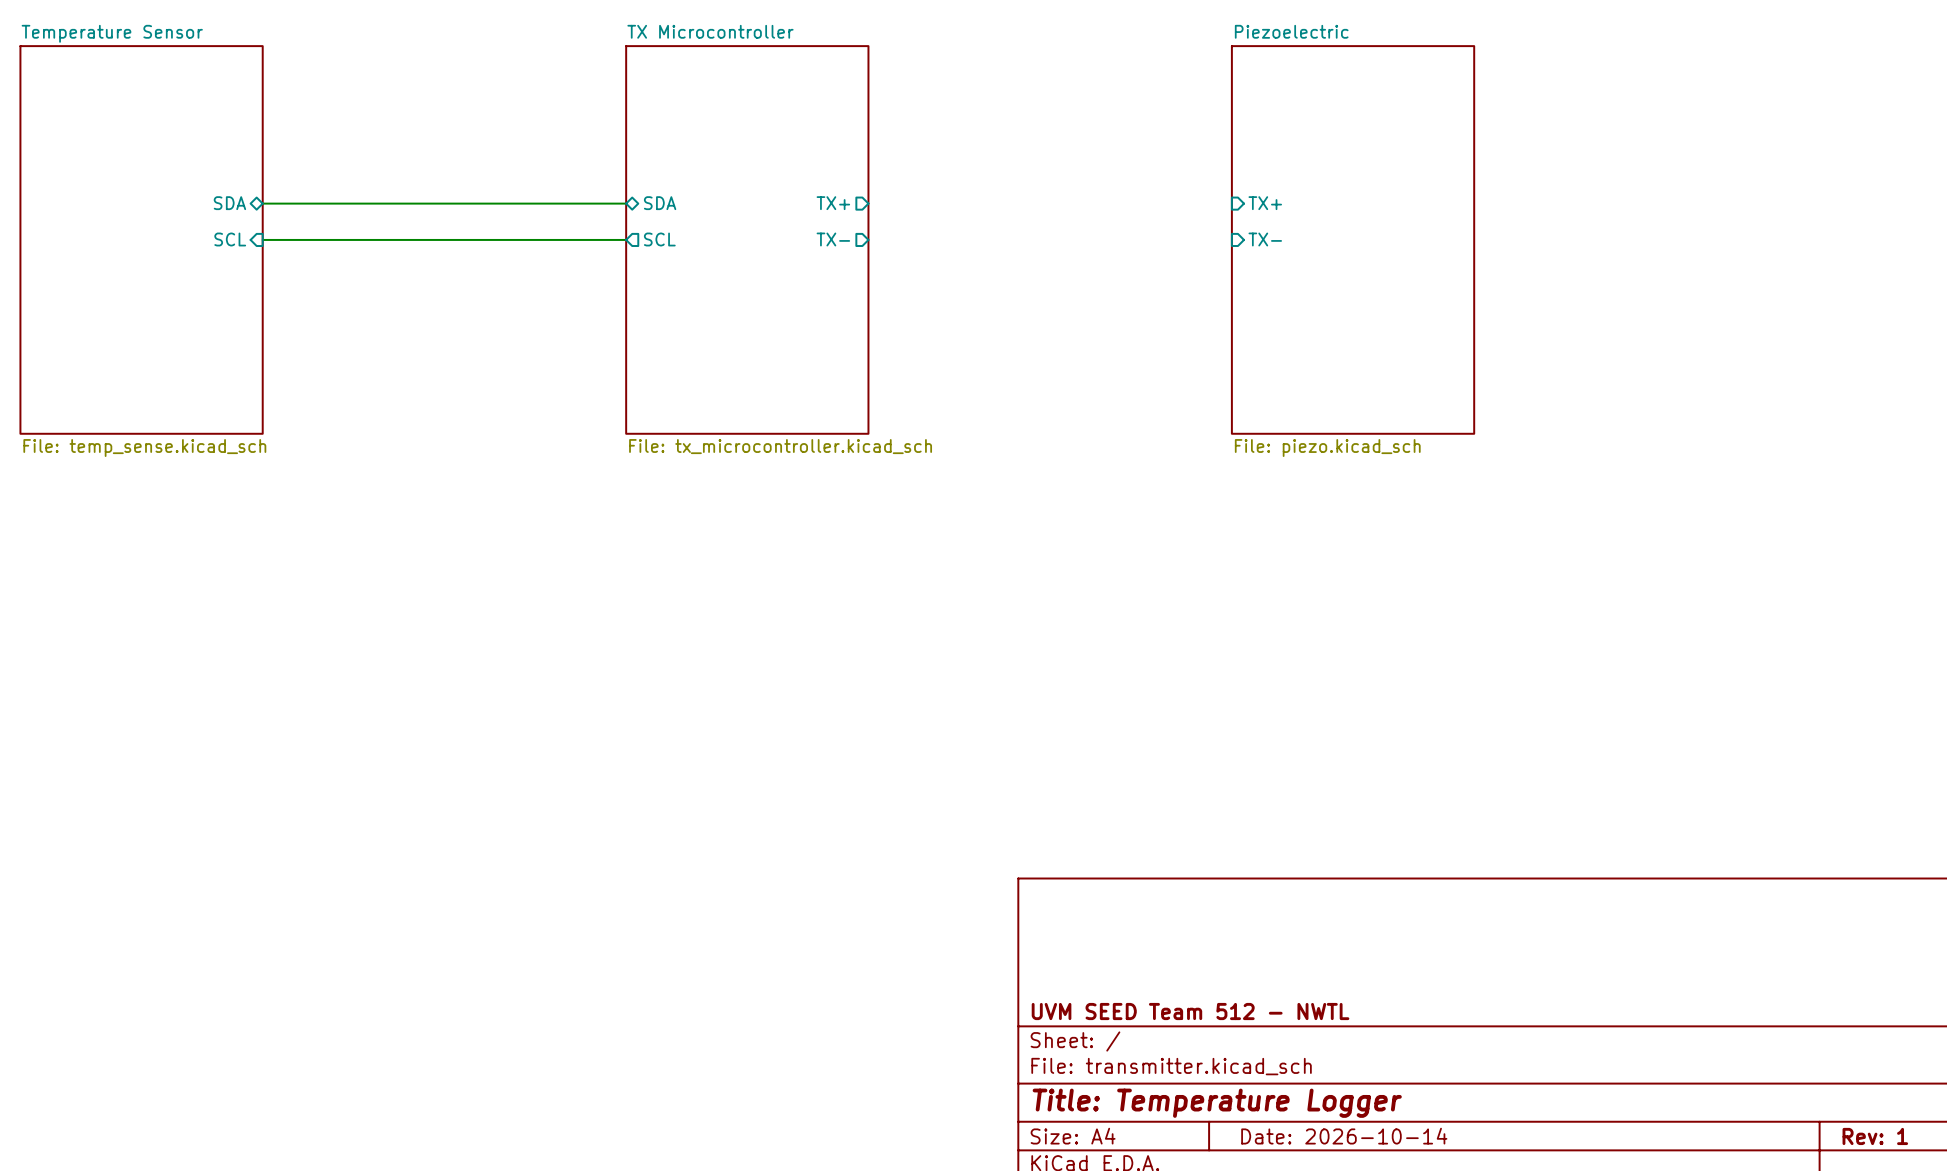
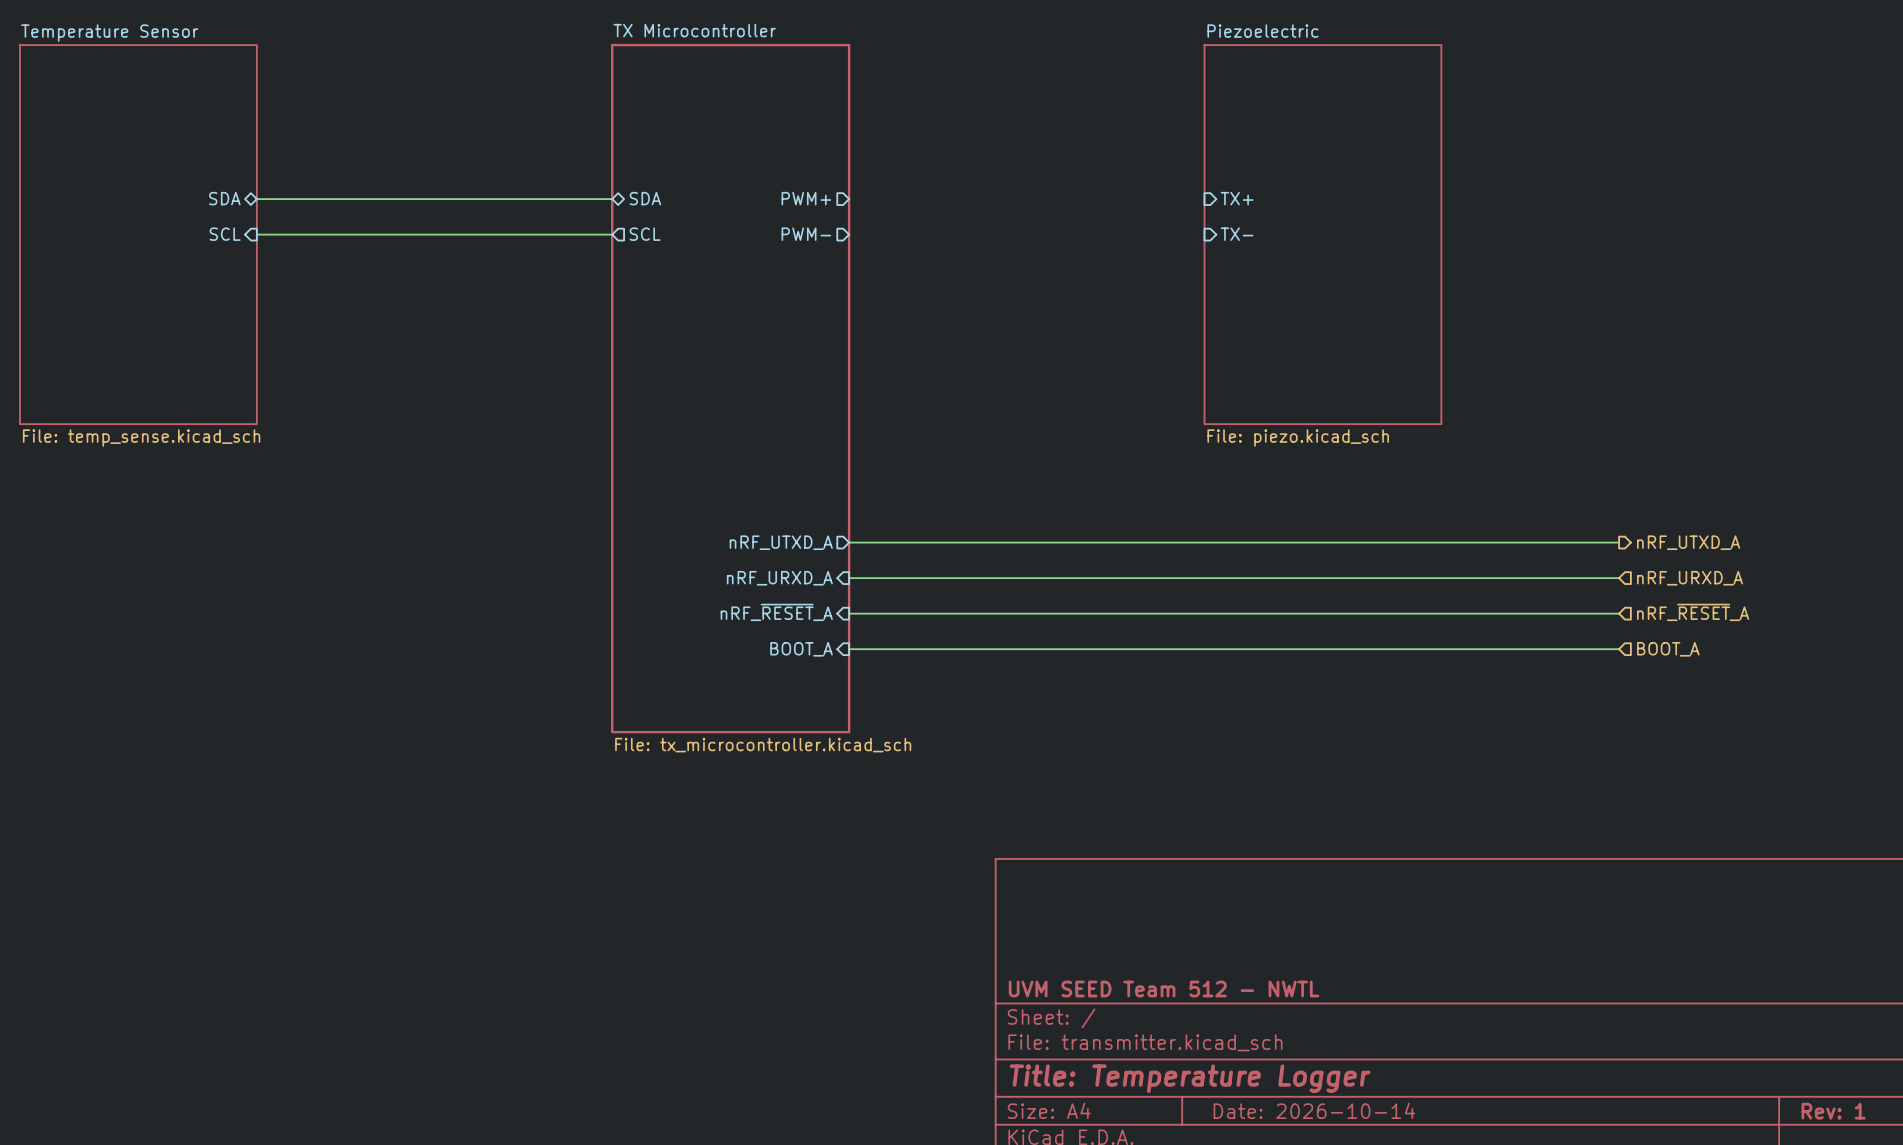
sheet pin: TX+ (833, 203) -> PWM+ (806, 198)
sheet TX Microcontroller: File: tx_microcontroller.kicad_sch (747, 239) -> none
sheet pin: TX- (833, 239) -> PWM- (806, 234)
sheet TX Microcontroller: none -> File: tx_microcontroller.kicad_sch (730, 388)
wire: none -> (849, 542) (1619, 542)
sheet pin: none -> nRF_UTXD_A (781, 542)
hierarchical label: none -> nRF_UTXD_A (1688, 542)
sheet pin: none -> nRF_URXD_A (779, 578)
wire: none -> (849, 578) (1619, 578)
hierarchical label: none -> nRF_URXD_A (1690, 578)
sheet pin: none -> nRF_~{RESET}_A (776, 612)
hierarchical label: none -> nRF_~{RESET}_A (1693, 612)
wire: none -> (849, 613) (1619, 613)
wire: none -> (849, 649) (1619, 649)
sheet pin: none -> BOOT_A (801, 649)
hierarchical label: none -> BOOT_A (1668, 649)

